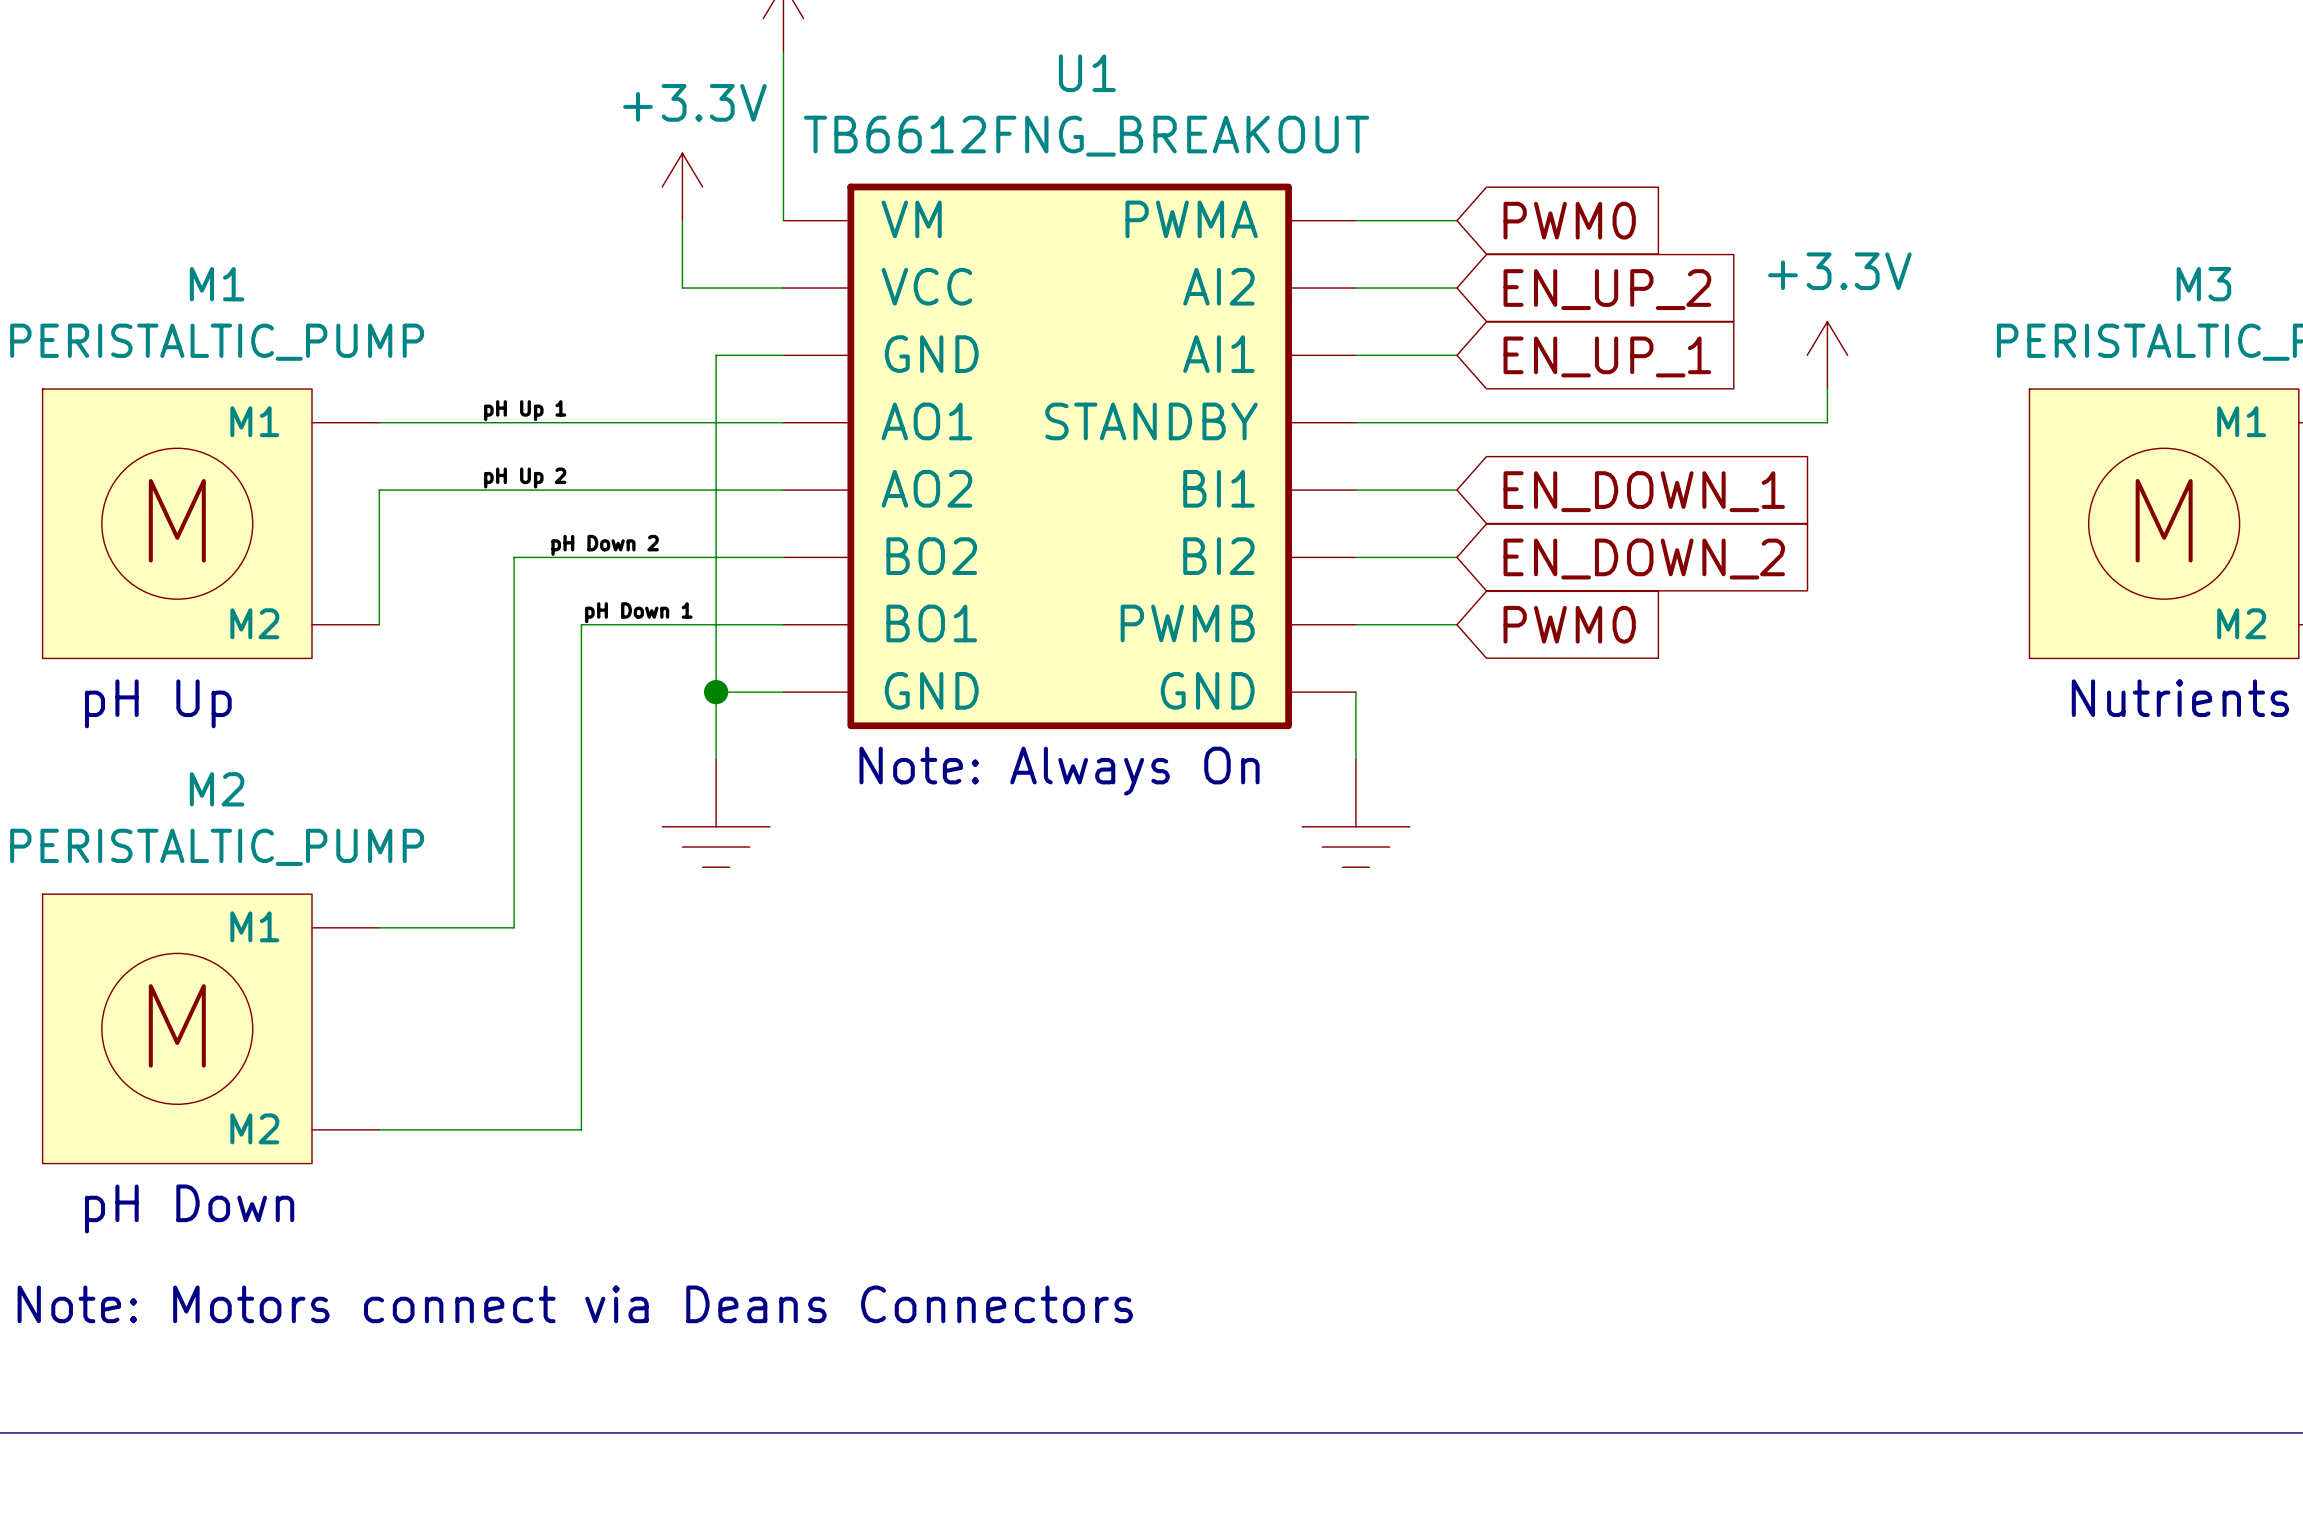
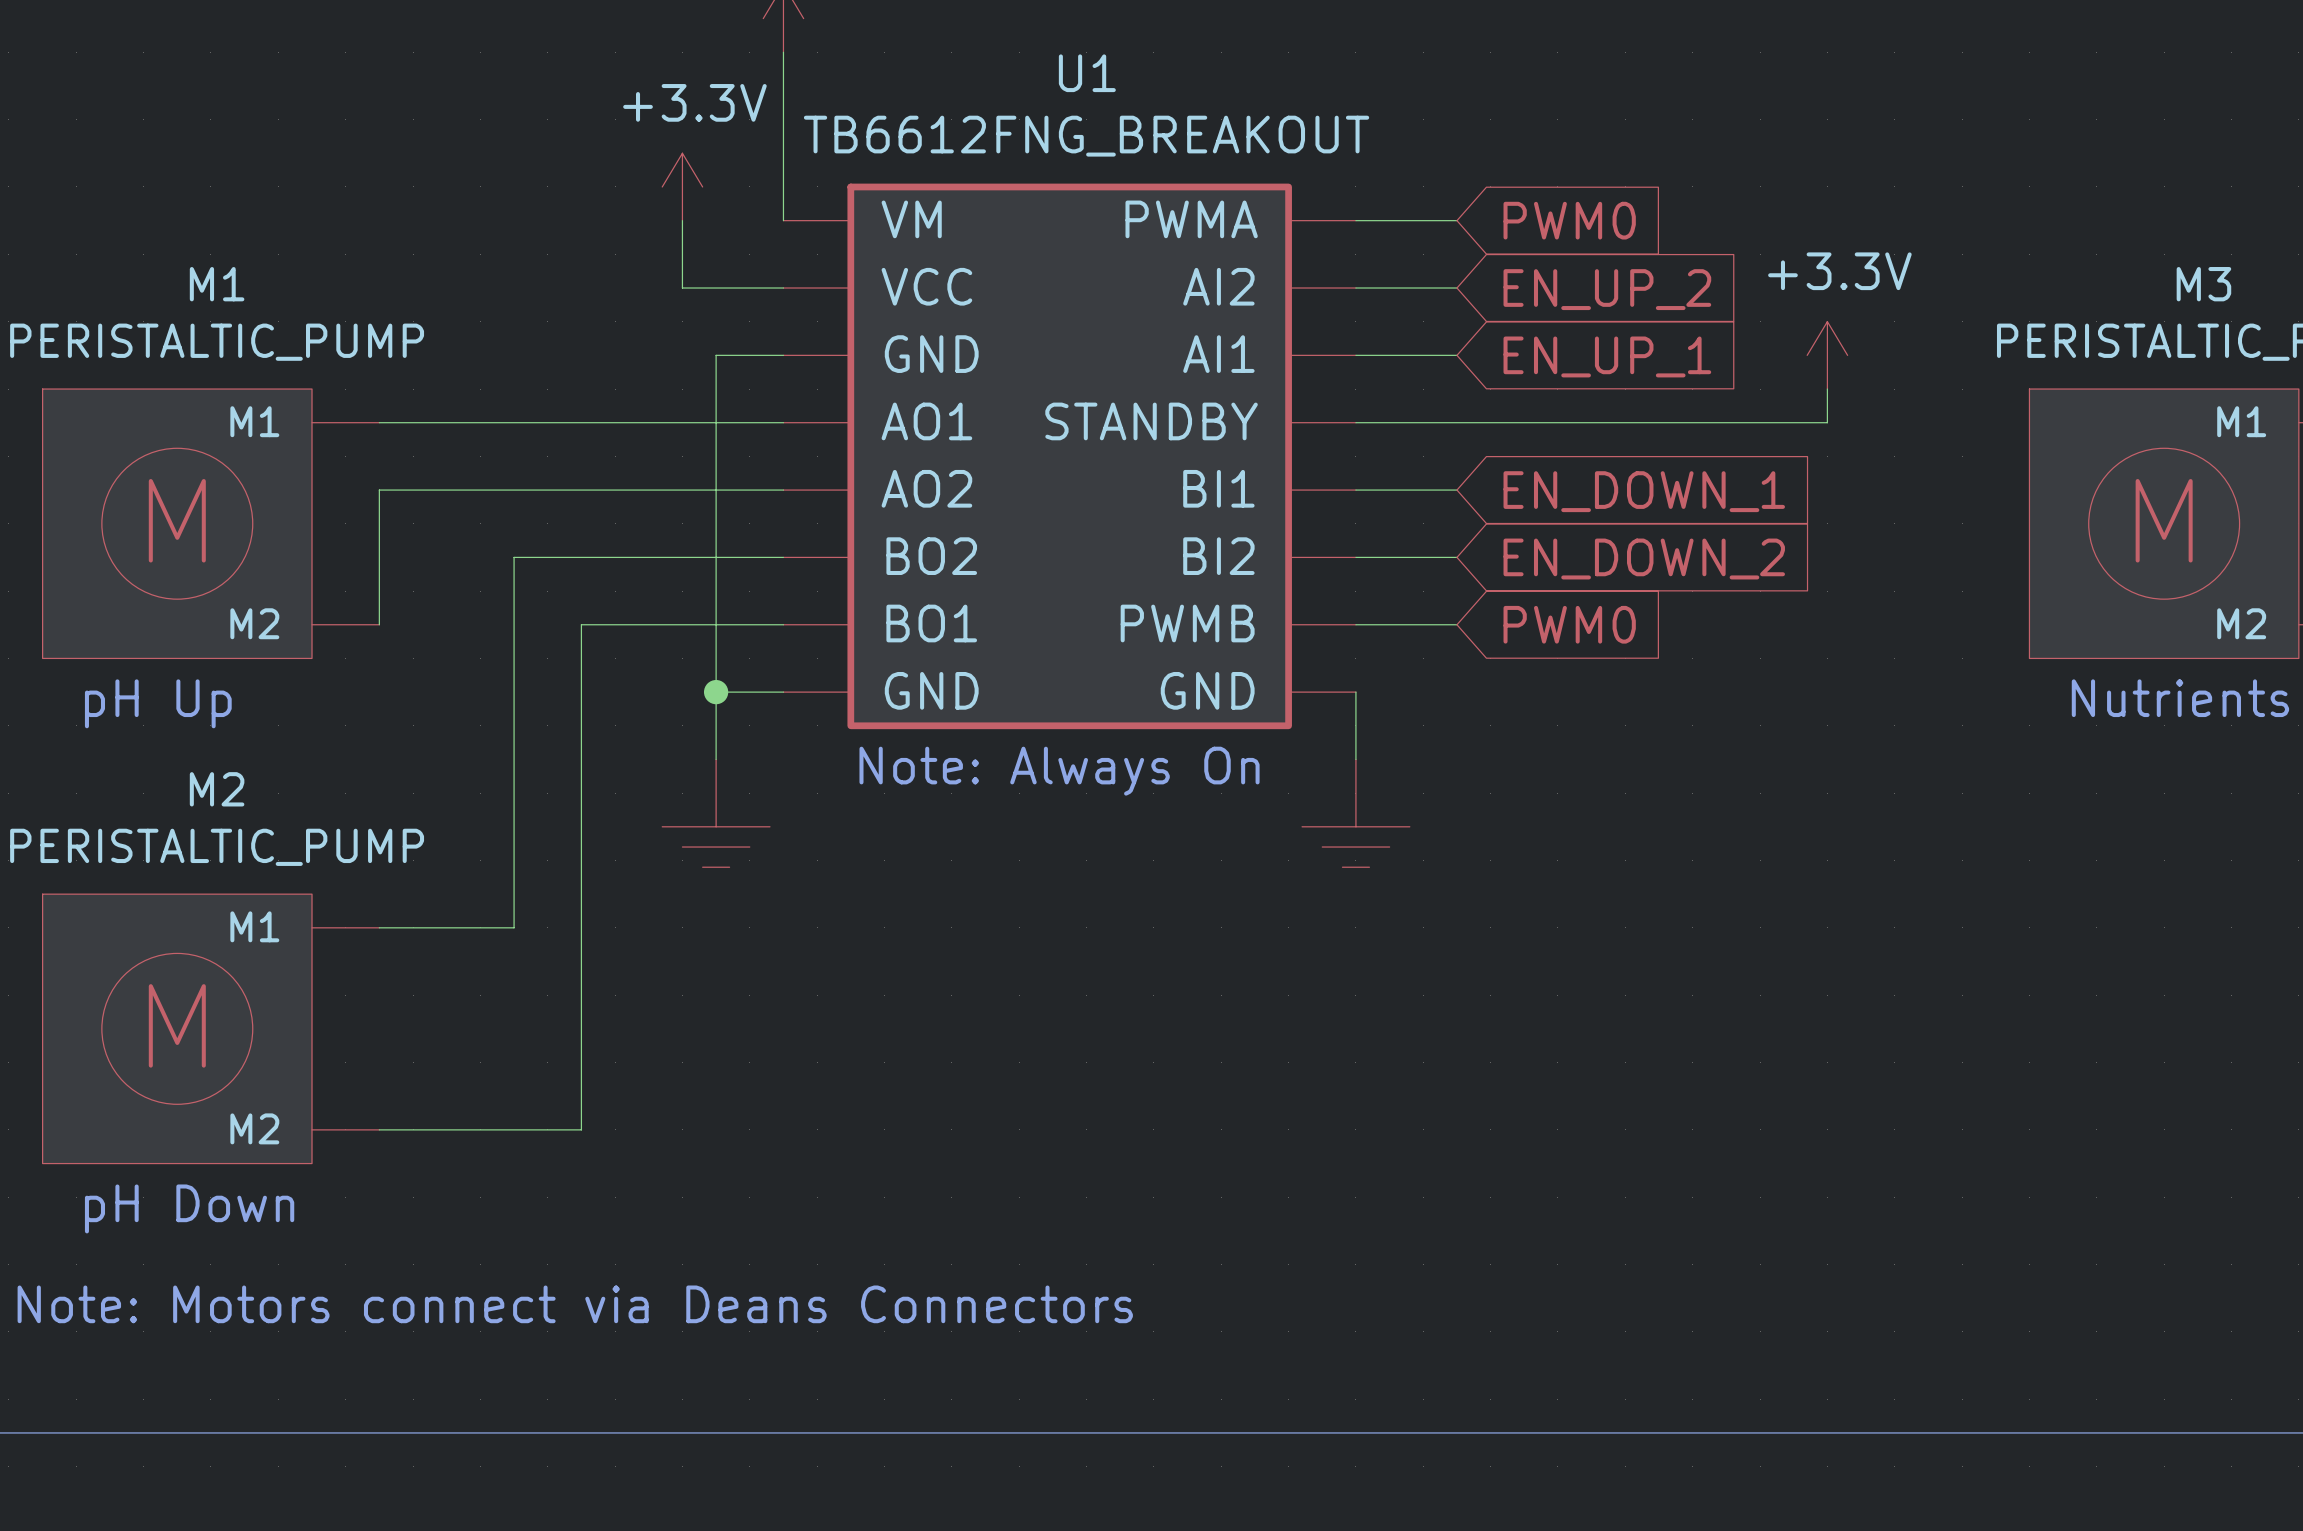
label: pH Up 1 (525, 410) -> none
label: pH Up 2 (525, 477) -> none
label: pH Down 2 (605, 545) -> none
label: pH Down 1 (638, 612) -> none

